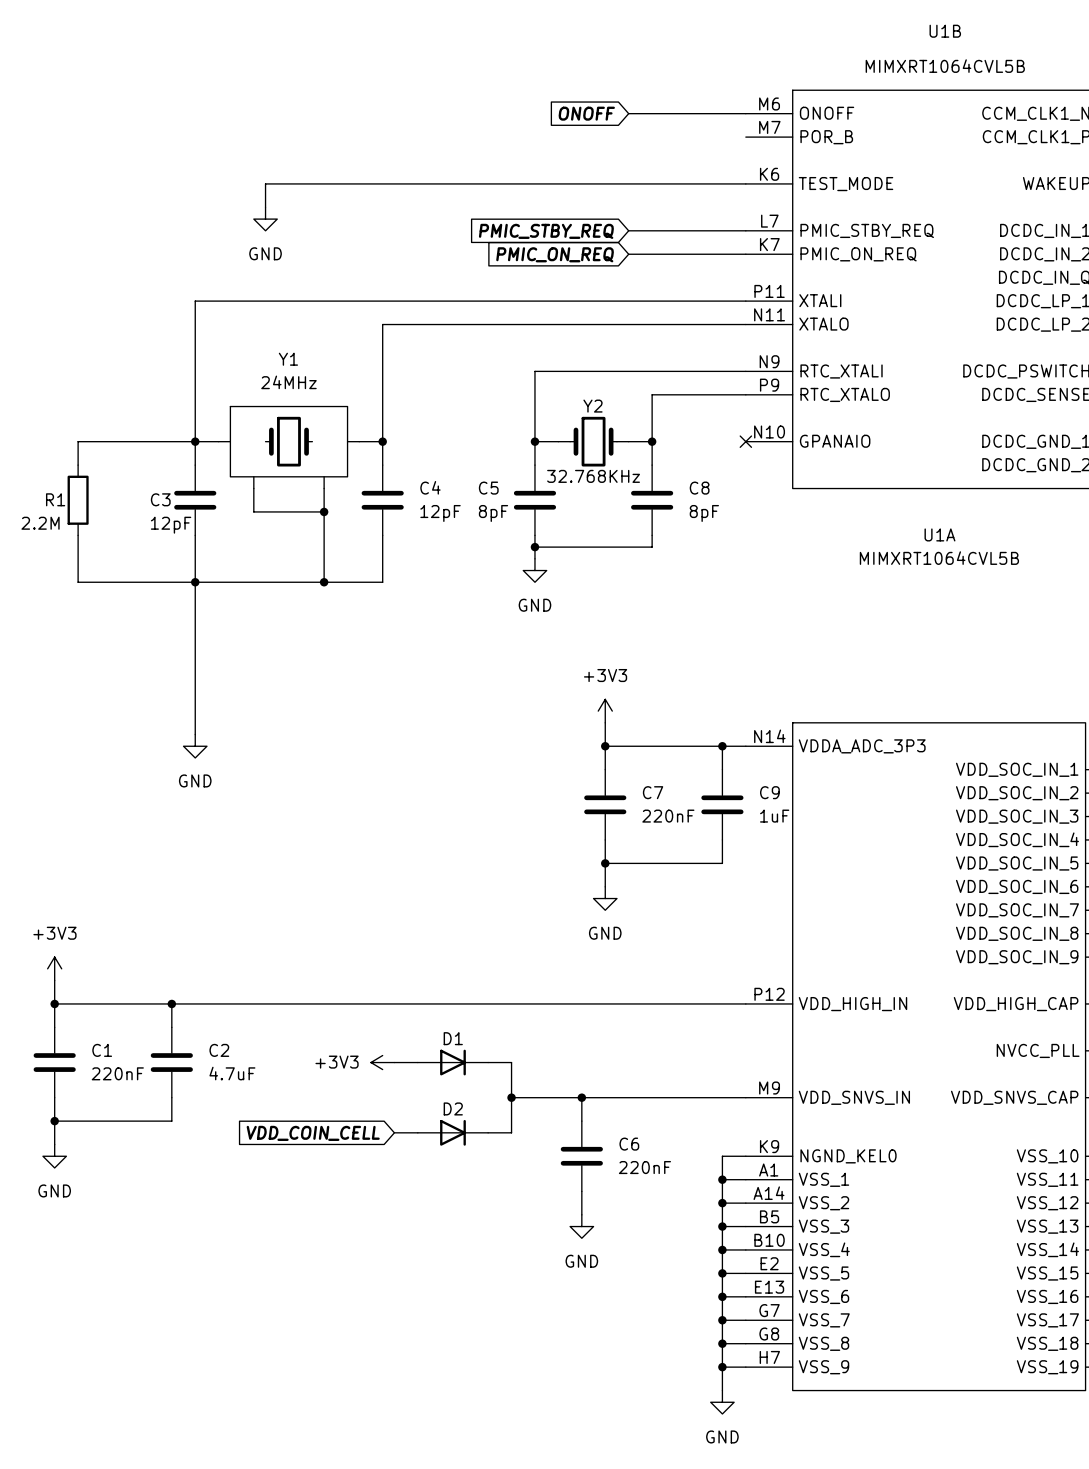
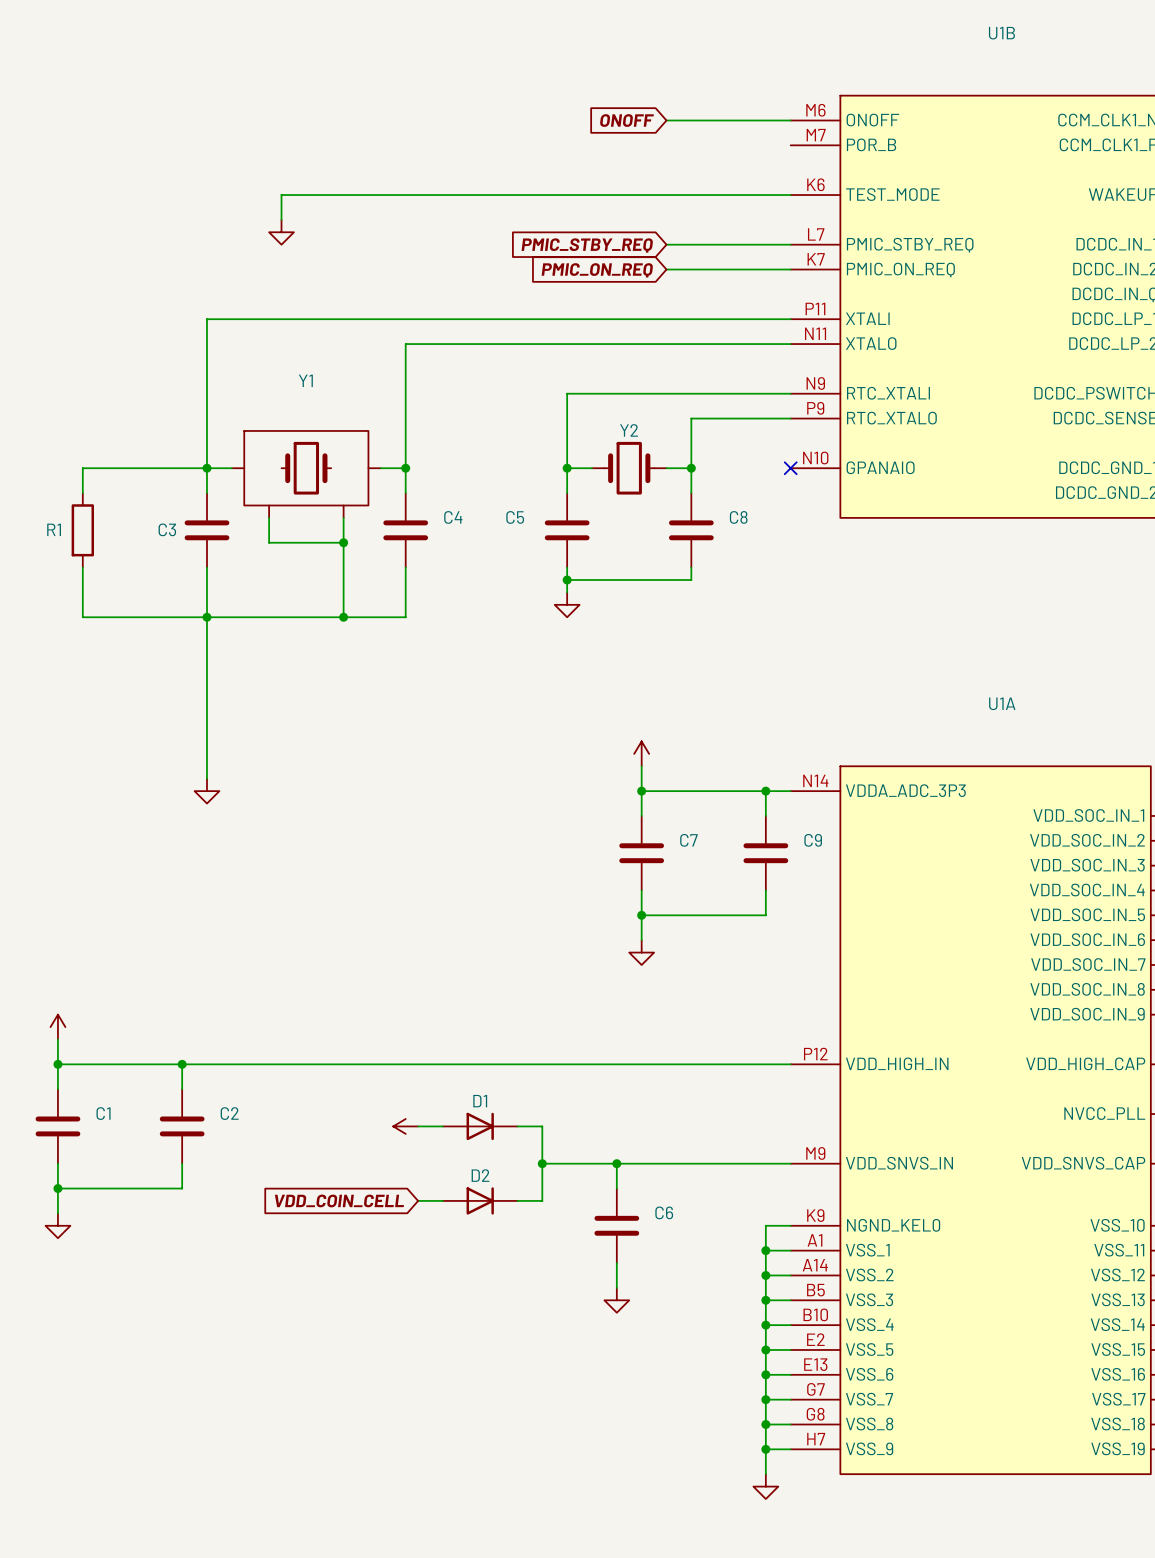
U1B value: MIMXRT1064CVL5B (945, 66) -> none
power symbol text: GND (265, 253) -> none
Y1 value: 24MHz (288, 382) -> none
Y2 value: 32.768KHz (593, 476) -> none
C4 value: 12pF (440, 513) -> none
C5 value: 8pF (493, 513) -> none
C8 value: 8pF (704, 513) -> none
R1 value: 2.2M (40, 523) -> none
C3 value: 12pF (171, 525) -> none
U1A name position: U1A (939, 534) -> U1A (1002, 703)
U1A value: MIMXRT1064CVL5B (939, 558) -> none
power symbol text: GND (534, 605) -> none
power symbol text: +3V3 (605, 675) -> none
power symbol text: GND (195, 780) -> none
C7 value: 220nF (668, 816) -> none
C9 value: 1uF (774, 816) -> none
power symbol text: +3V3 (54, 933) -> none
power symbol text: GND (605, 933) -> none
power symbol text: +3V3 (337, 1062) -> none
C1 value: 220nF (117, 1073) -> none
C2 value: 4.7uF (232, 1073) -> none
C6 value: 220nF (644, 1167) -> none
power symbol text: GND (54, 1190) -> none
power symbol text: GND (581, 1261) -> none
power symbol text: GND (722, 1436) -> none

